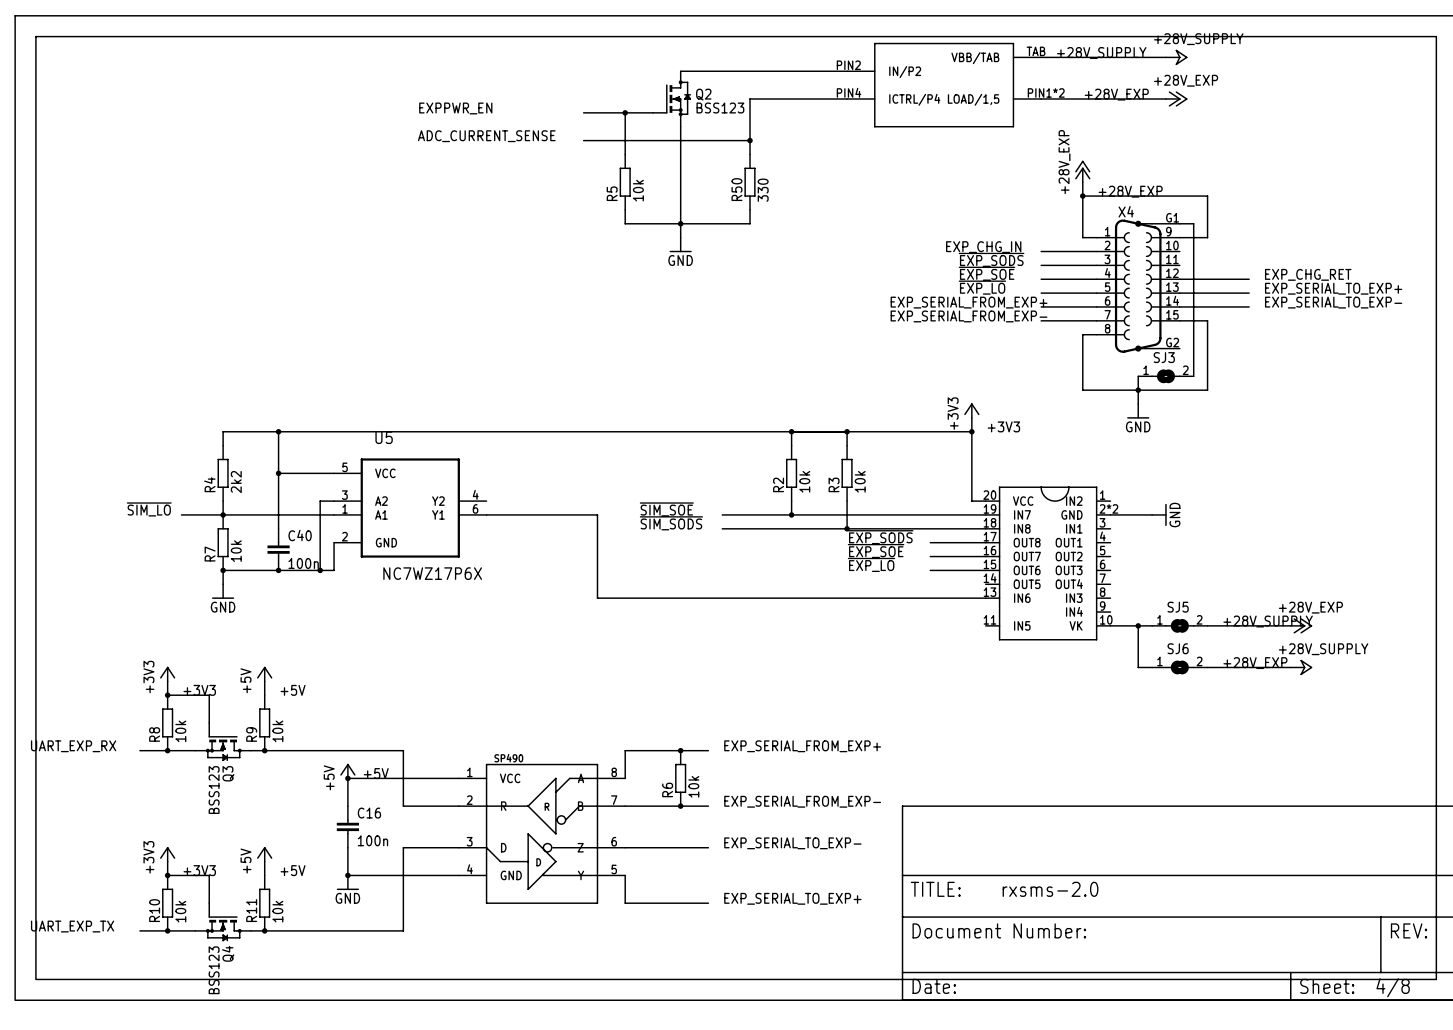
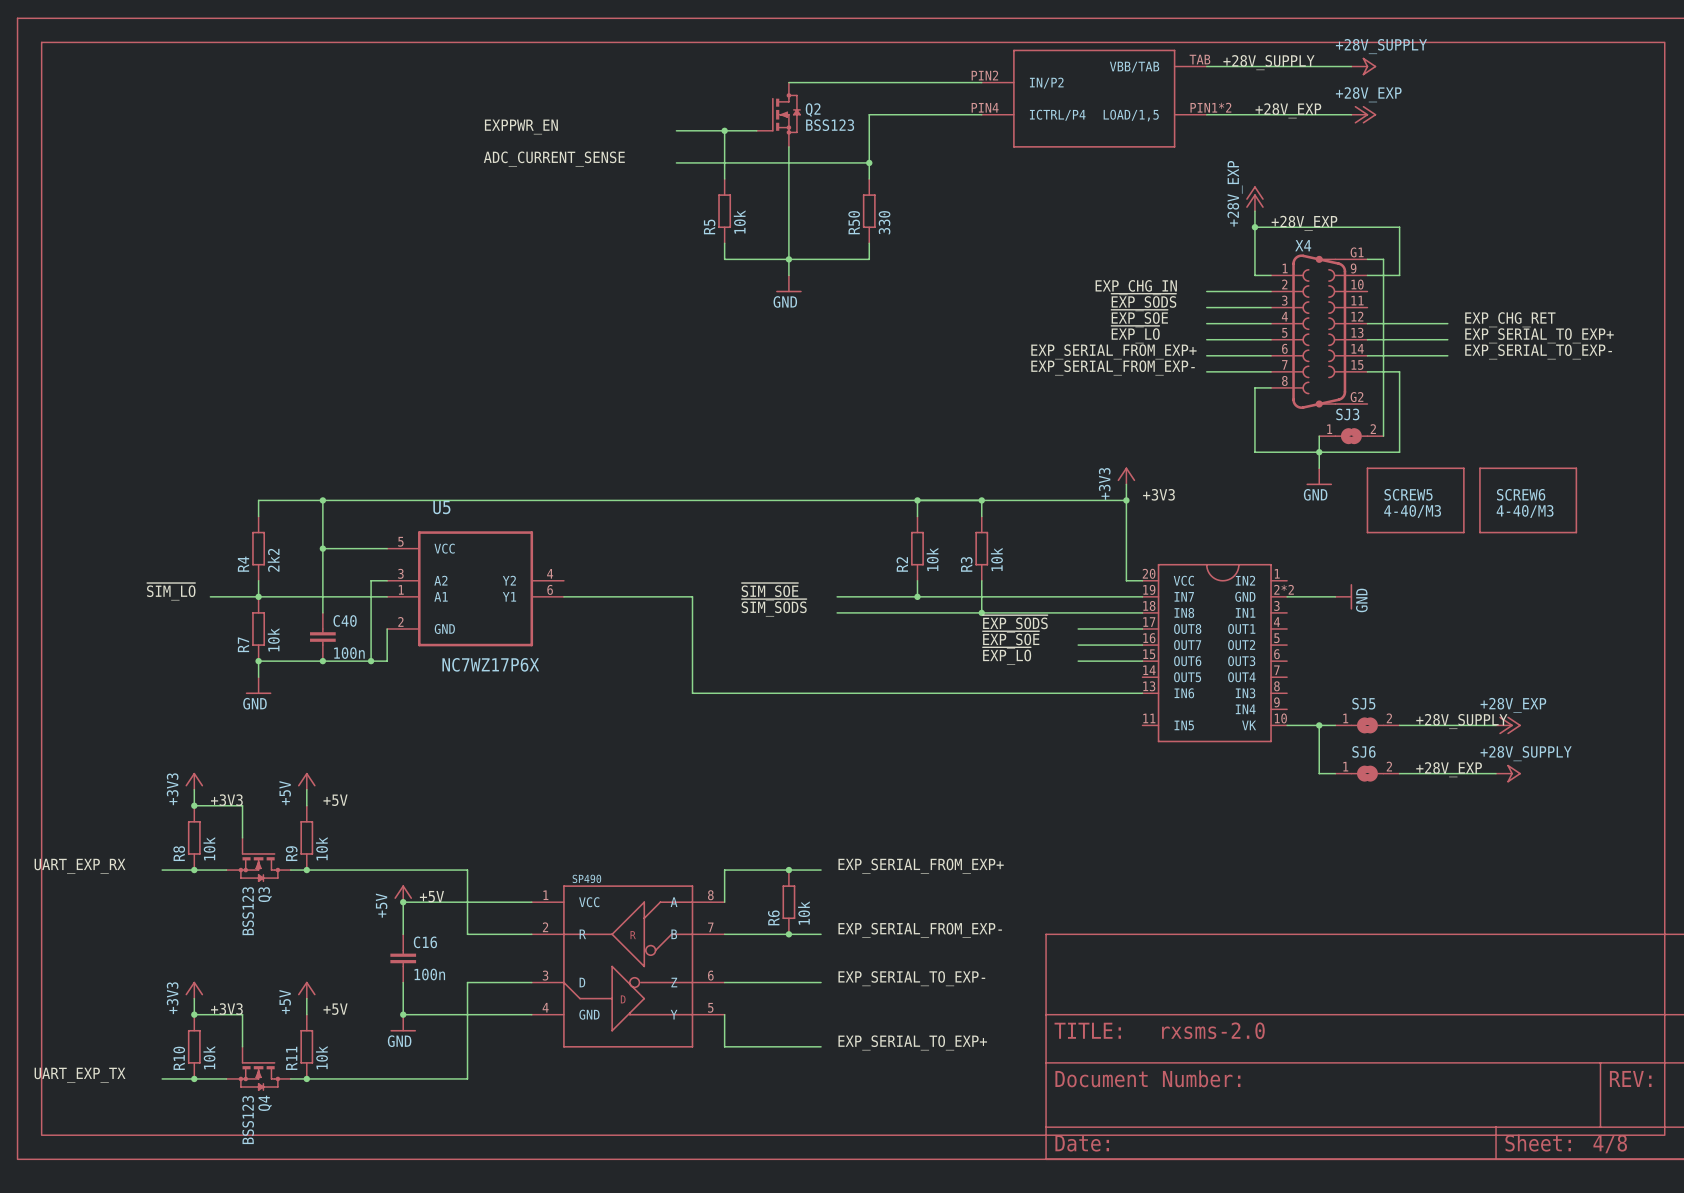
SCREW5: none -> 4-40/M3 (1415, 500)
SCREW6: none -> 4-40/M3 (1528, 500)

